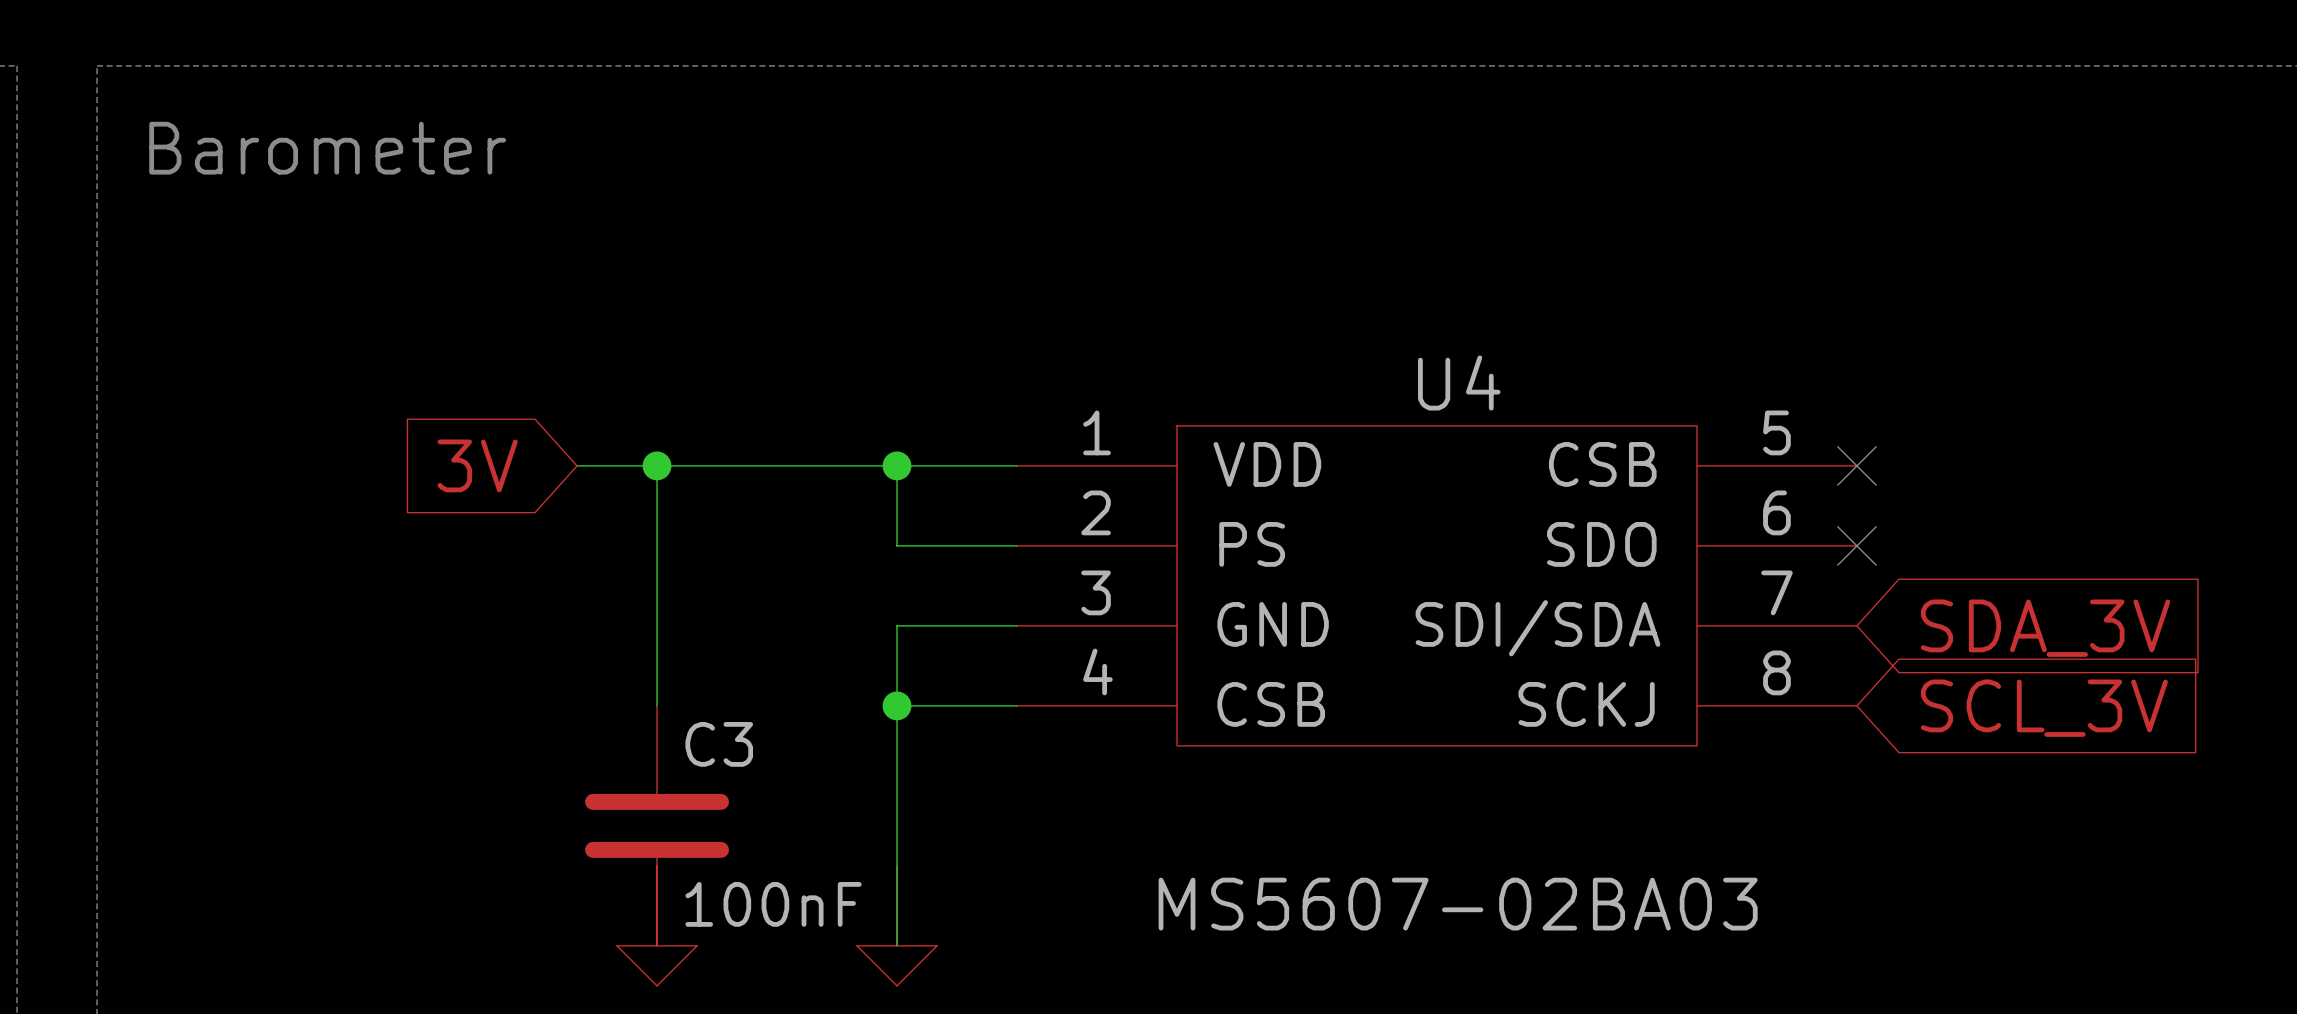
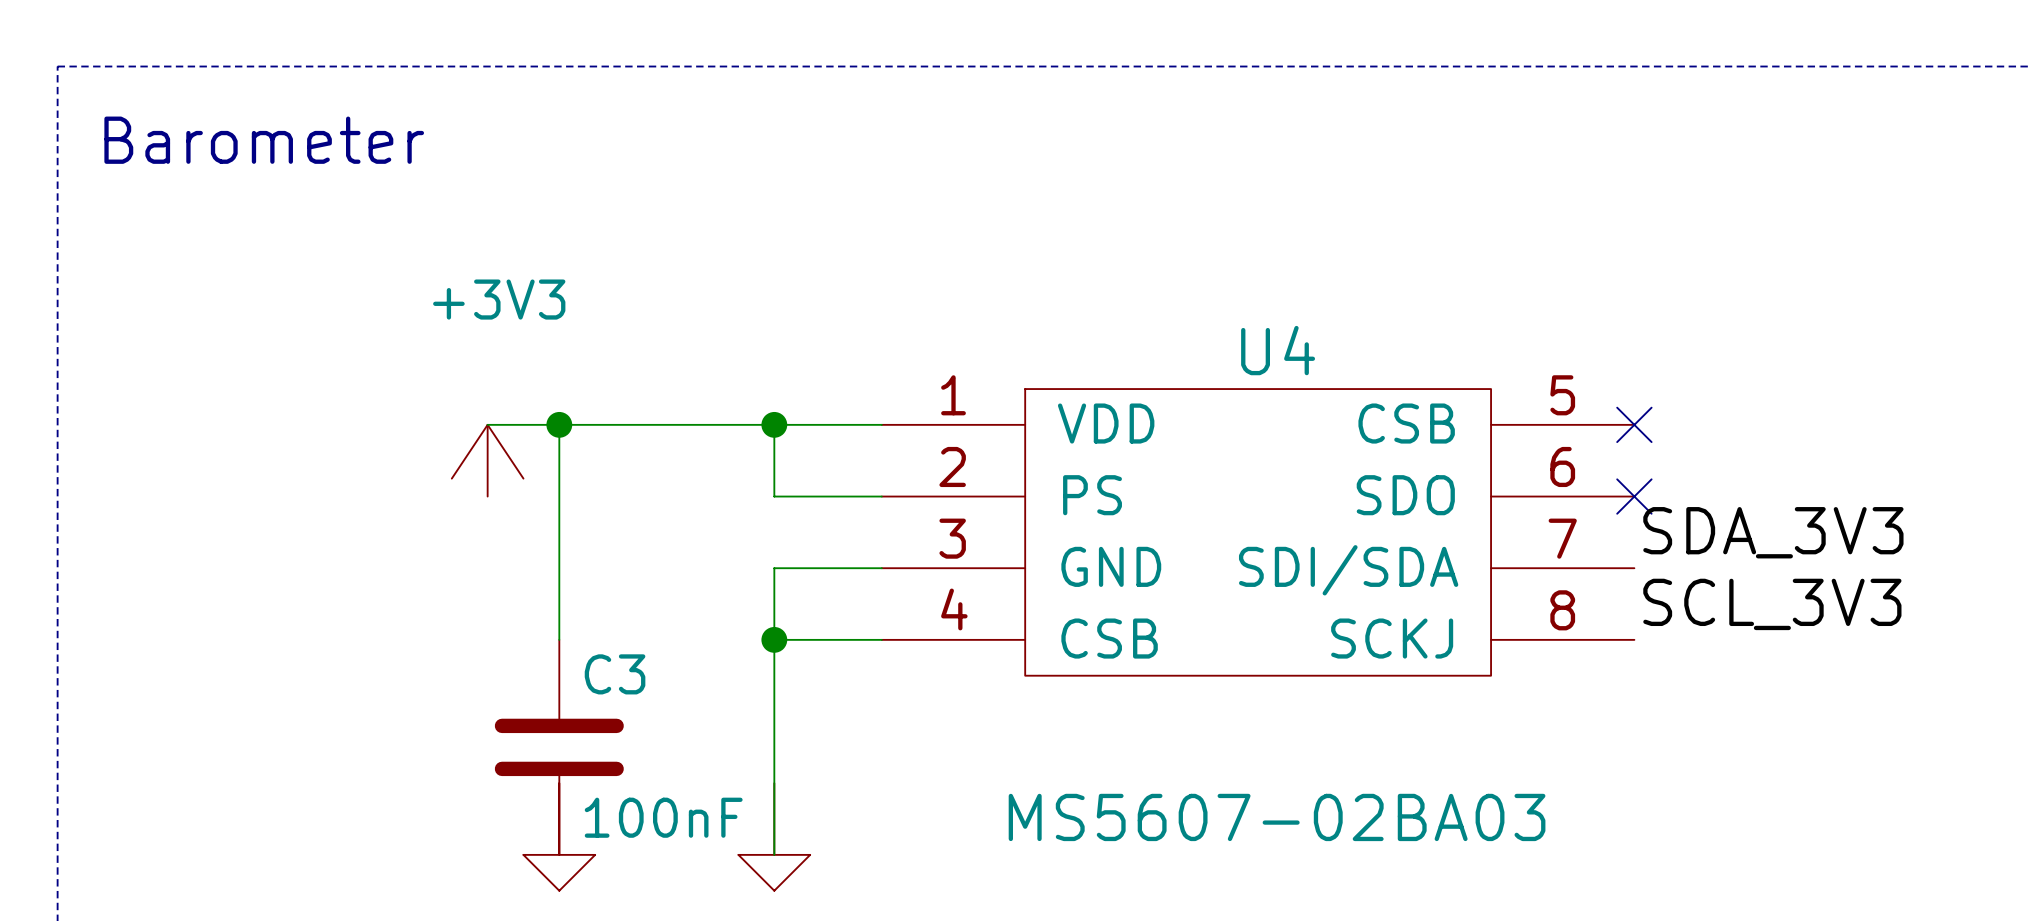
global label: 3V (477, 465) -> none
power symbol: none -> +3V3 (487, 460)
label: none -> SDA_3V3 (1773, 532)
global label: SDA_3V (2045, 628) -> none
label: none -> SCL_3V3 (1772, 604)
global label: SCL_3V (2044, 708) -> none

